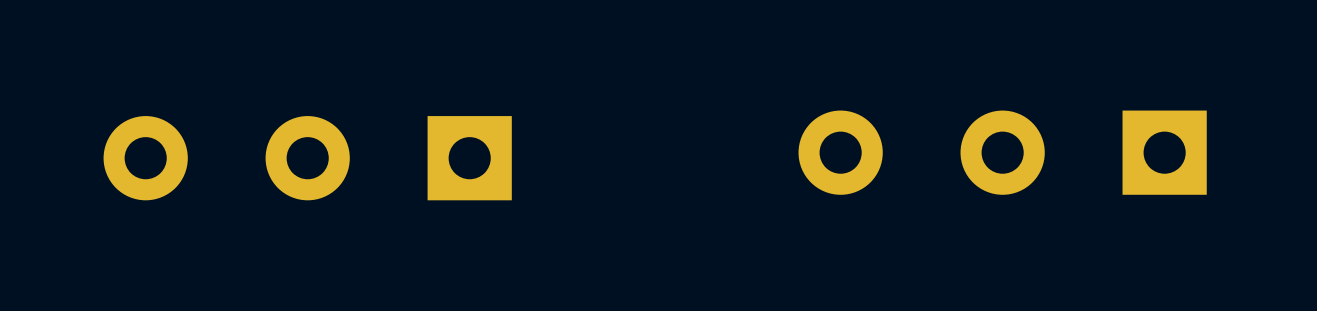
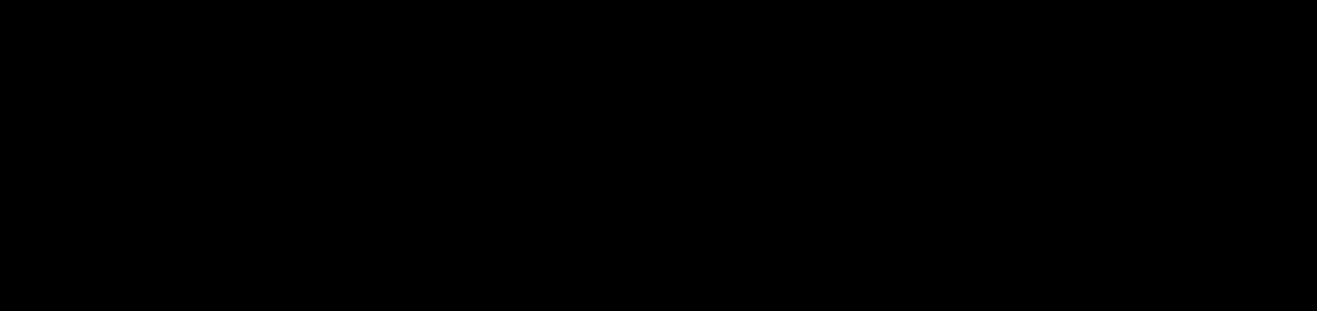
part: (1002, 152) -> none
part: (307, 158) -> none

